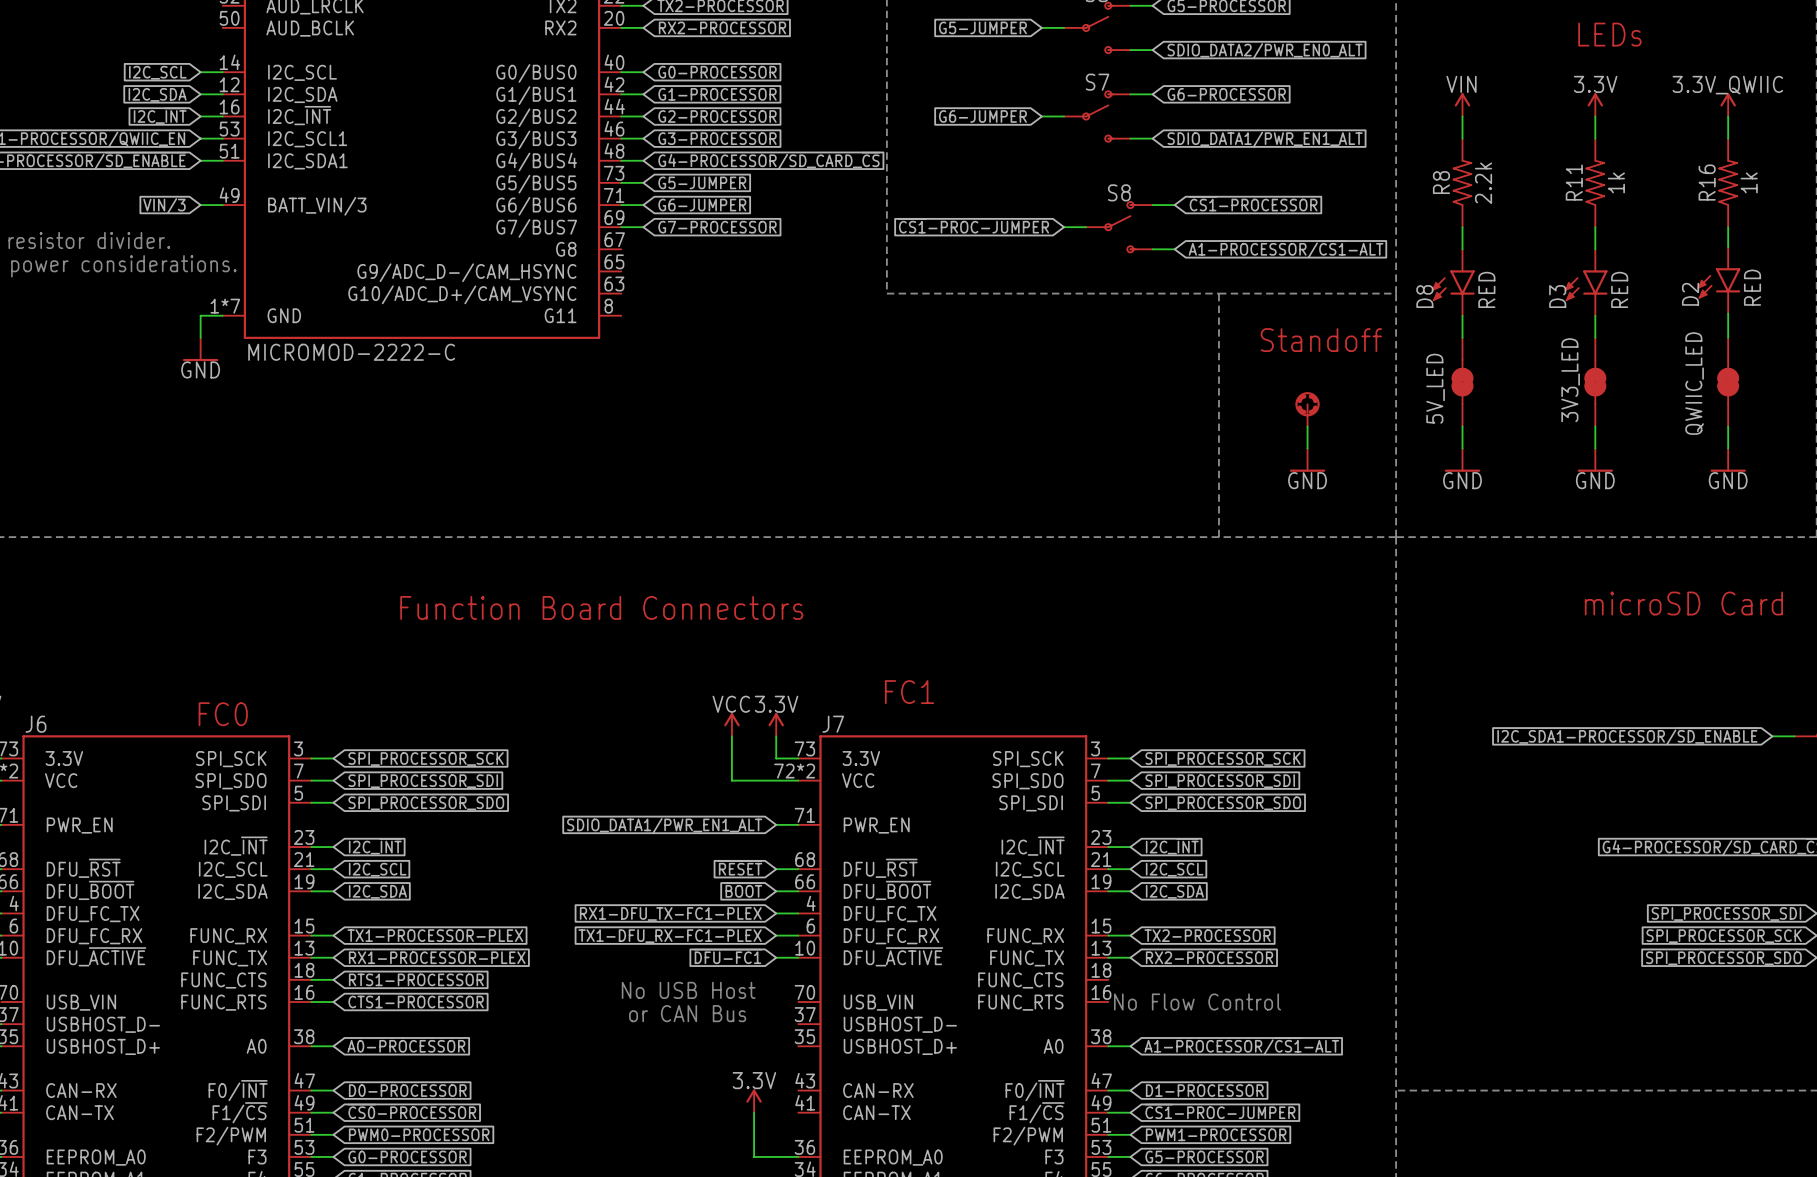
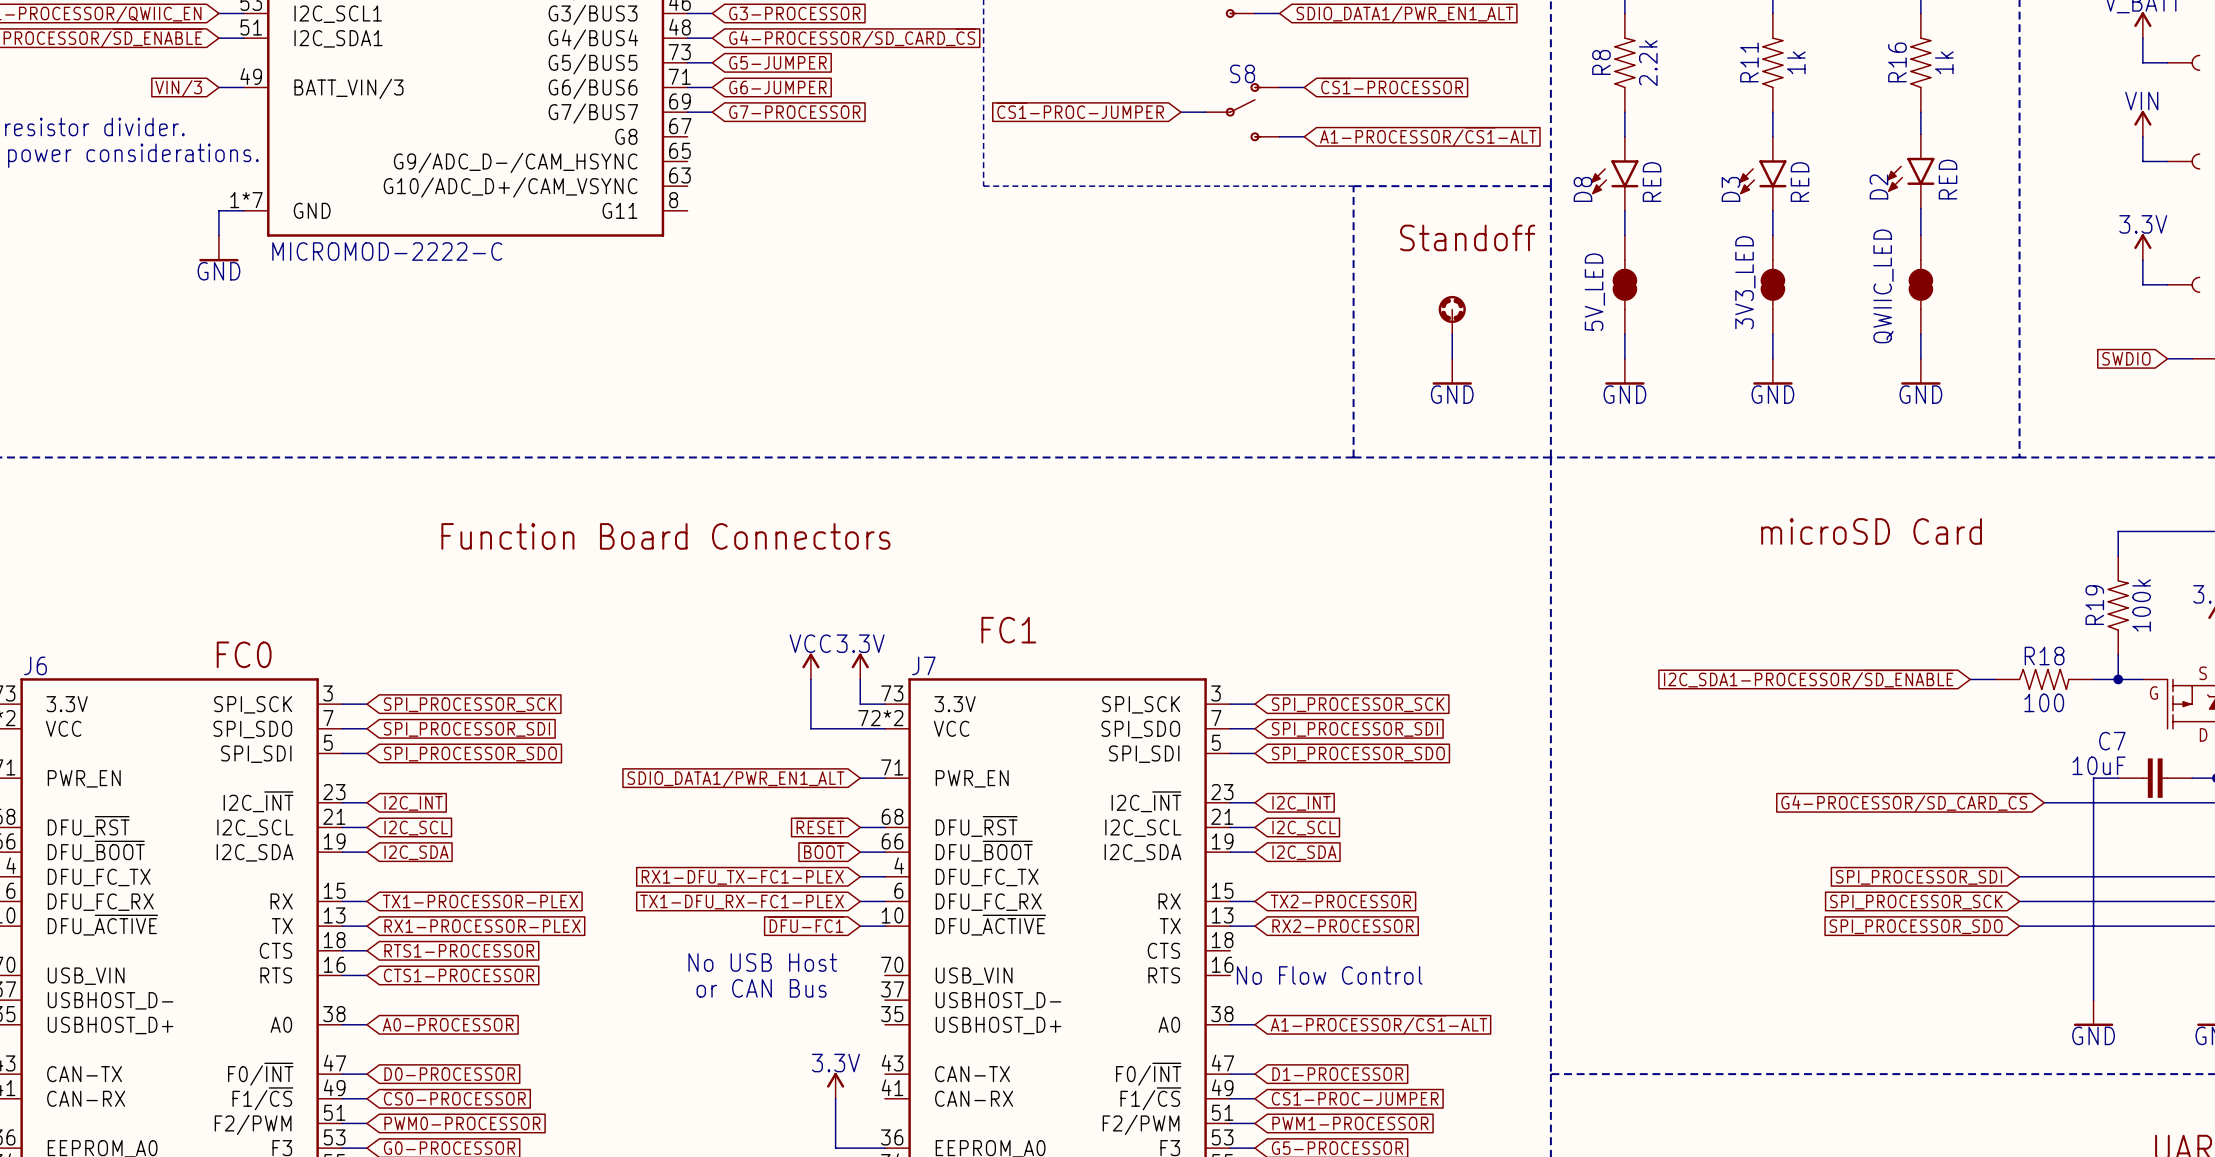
J6 pin name: FUNC_RX (228, 936) -> RX (281, 901)
J7 pin name: FUNC_RX (1025, 936) -> RX (1169, 901)
J6 pin name: FUNC_TX (230, 958) -> TX (282, 926)
J7 pin name: FUNC_TX (1027, 958) -> TX (1170, 926)
J6 pin name: FUNC_CTS (223, 980) -> CTS (275, 950)
J7 pin name: FUNC_CTS (1020, 980) -> CTS (1163, 950)
J6 pin name: FUNC_RTS (223, 1002) -> RTS (276, 975)
J7 pin name: FUNC_RTS (1020, 1002) -> RTS (1164, 975)
J6 pin name: CAN-RX (81, 1090) -> CAN-TX (84, 1074)
J7 pin name: CAN-RX (878, 1090) -> CAN-TX (972, 1074)
J6 pin name: CAN-TX (80, 1112) -> CAN-RX (86, 1098)
J7 pin name: CAN-TX (876, 1112) -> CAN-RX (974, 1098)

